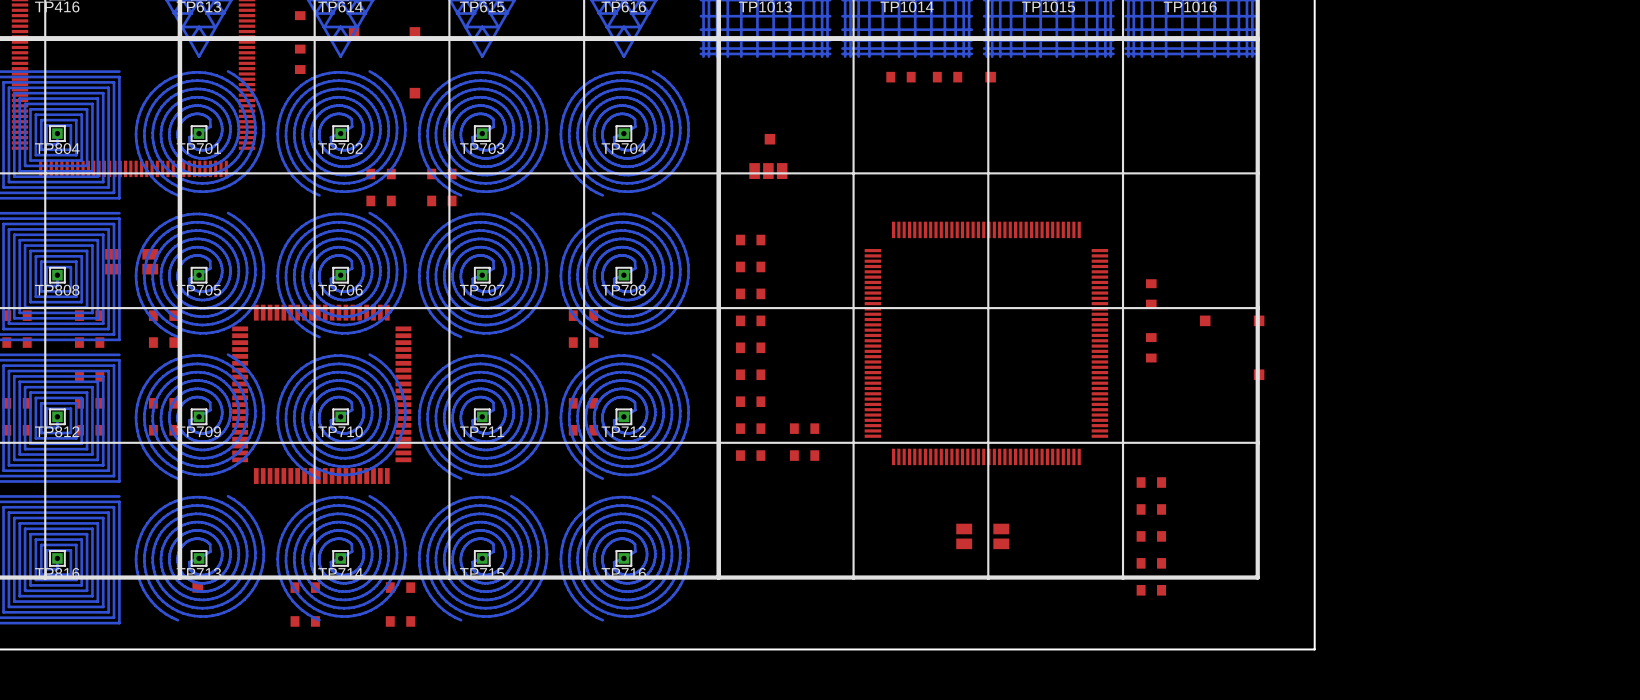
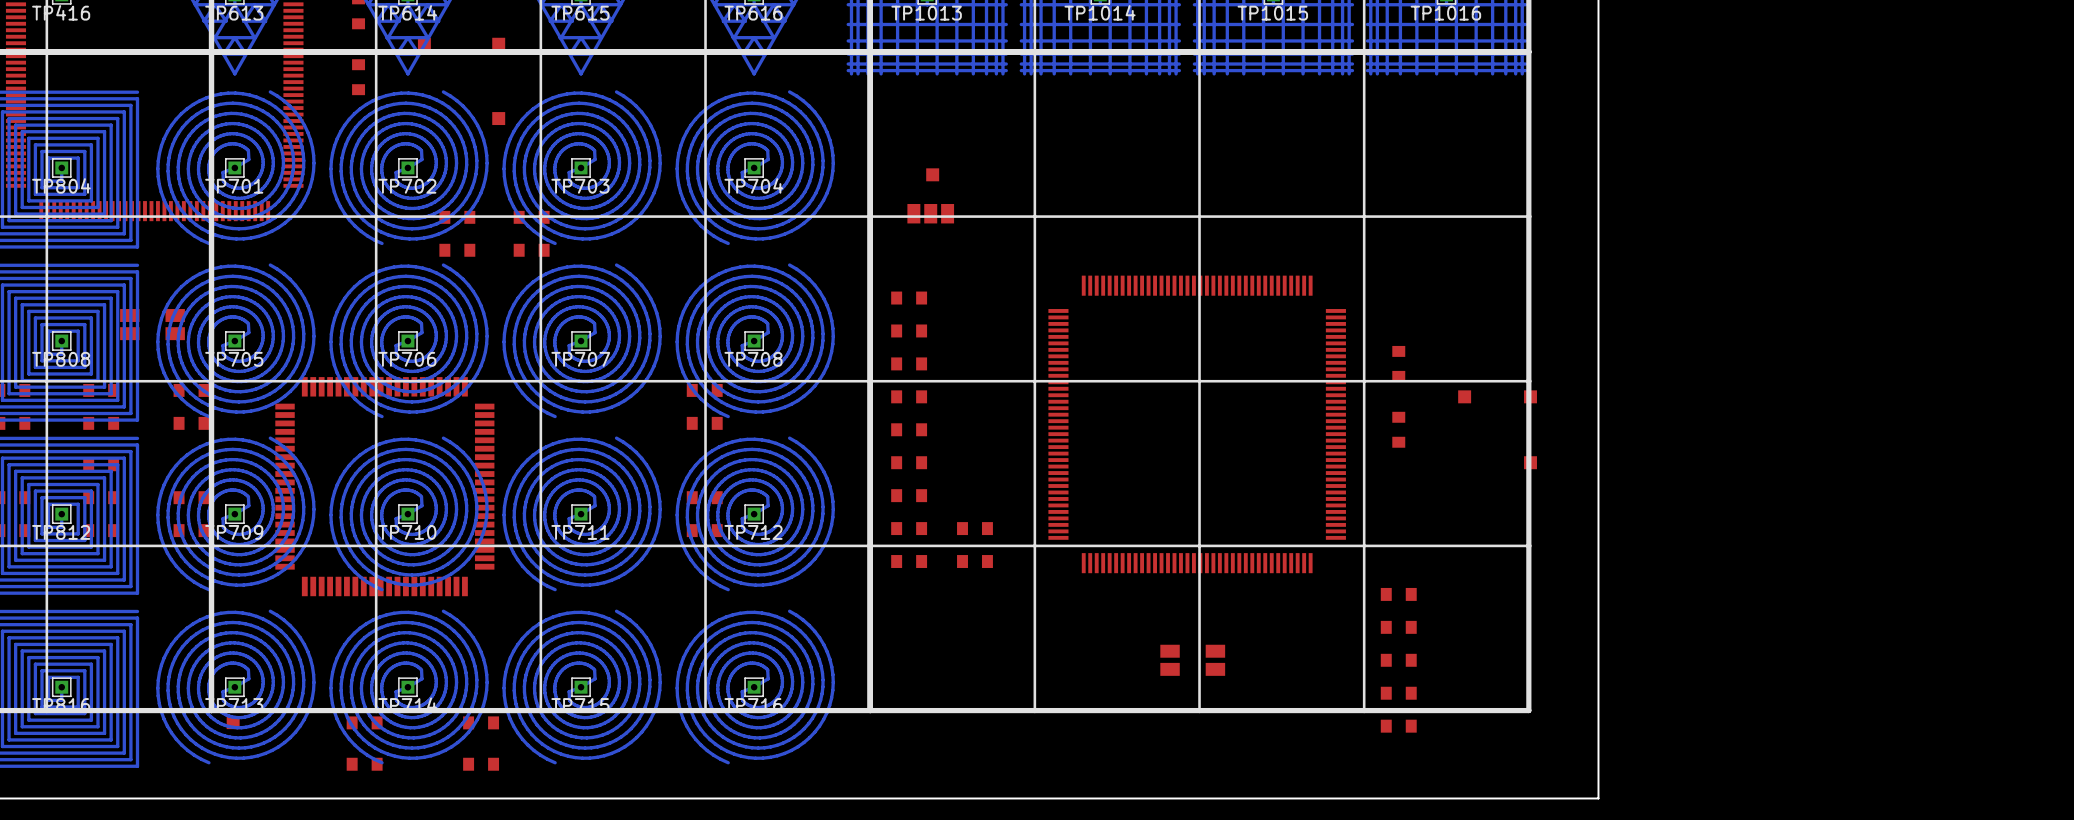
part: (900, 77) -> none
part: (947, 77) -> none
part: (990, 77) -> none

